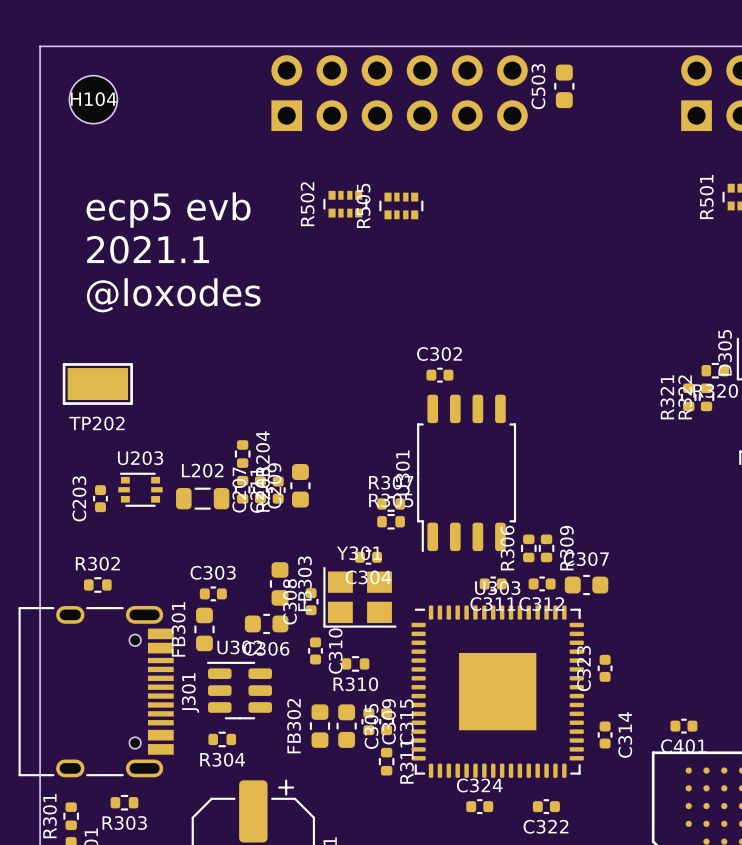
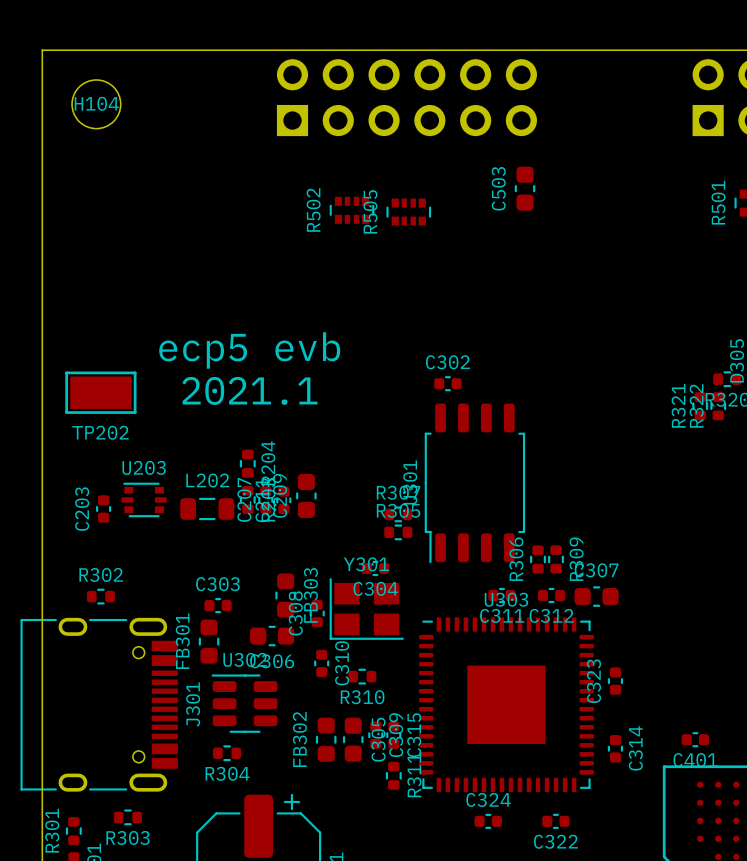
C503 position: (564, 86) -> (525, 188)
text position: ecp5 evb (168, 210) -> ecp5 evb (249, 350)
text position: 2021.1 (148, 249) -> 2021.1 (249, 390)
text: @loxodes (173, 295) -> none

